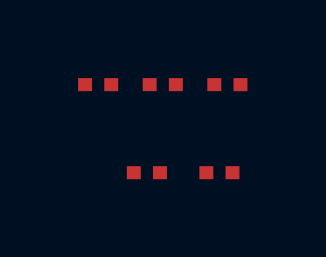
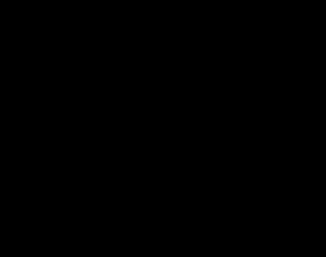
part: (98, 84) -> none
part: (162, 84) -> none
part: (227, 84) -> none
part: (146, 172) -> none
part: (219, 172) -> none

